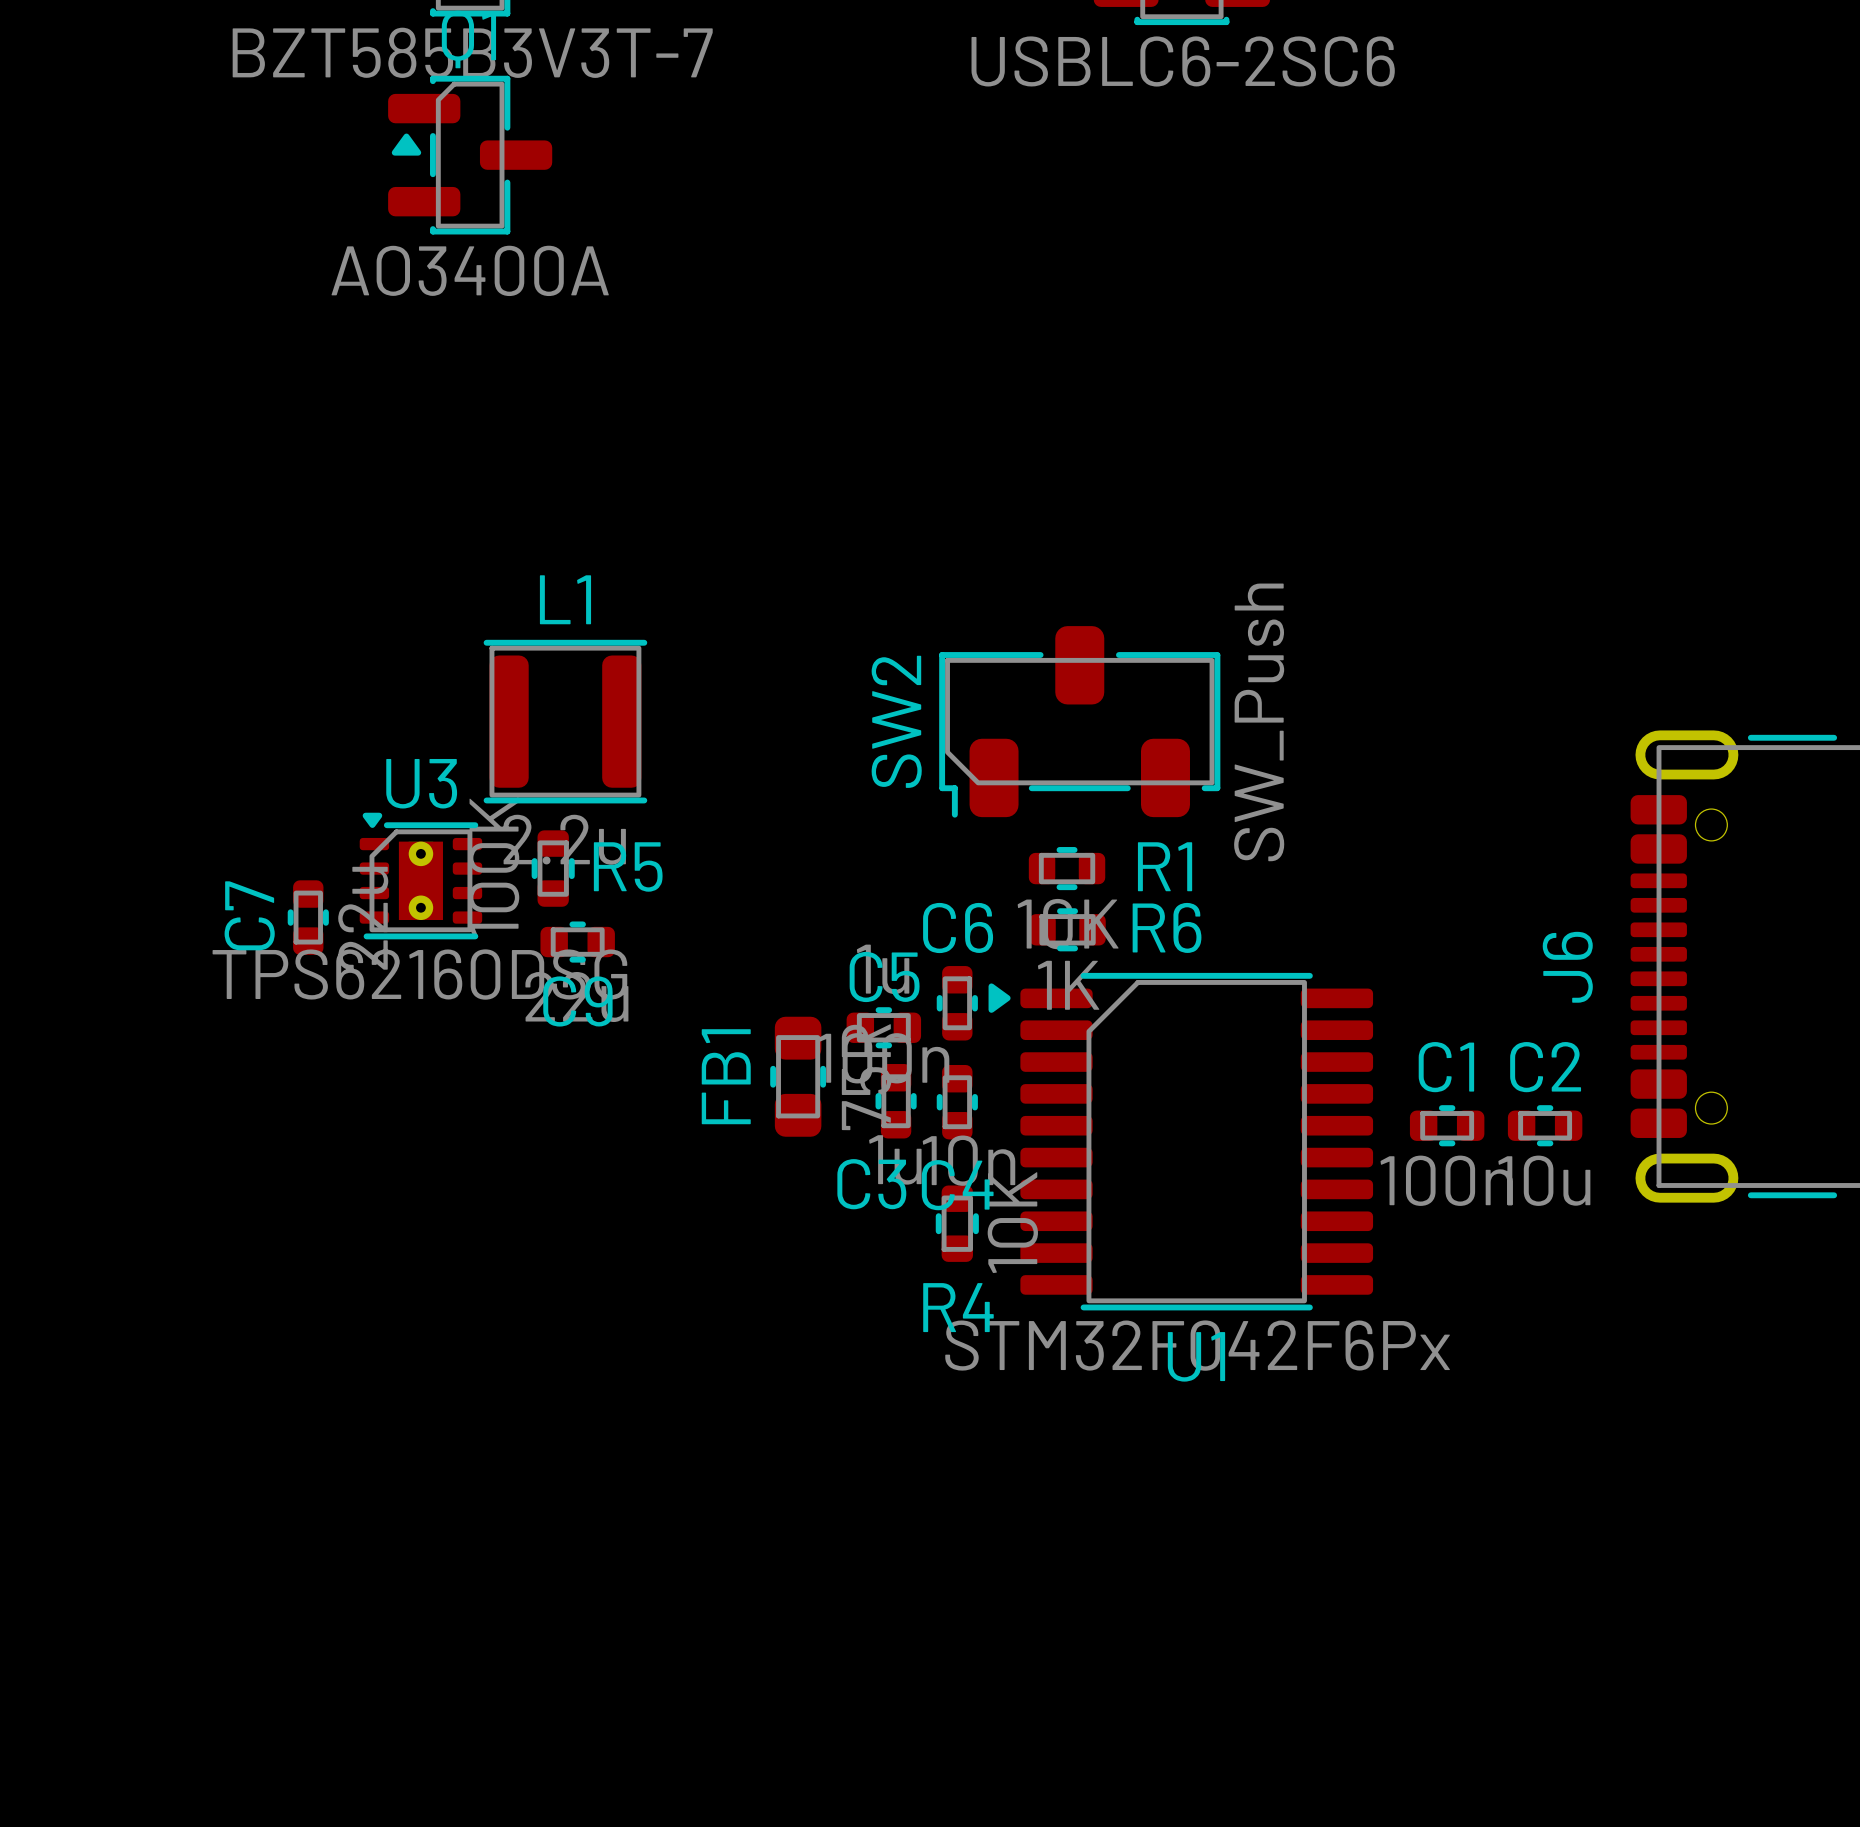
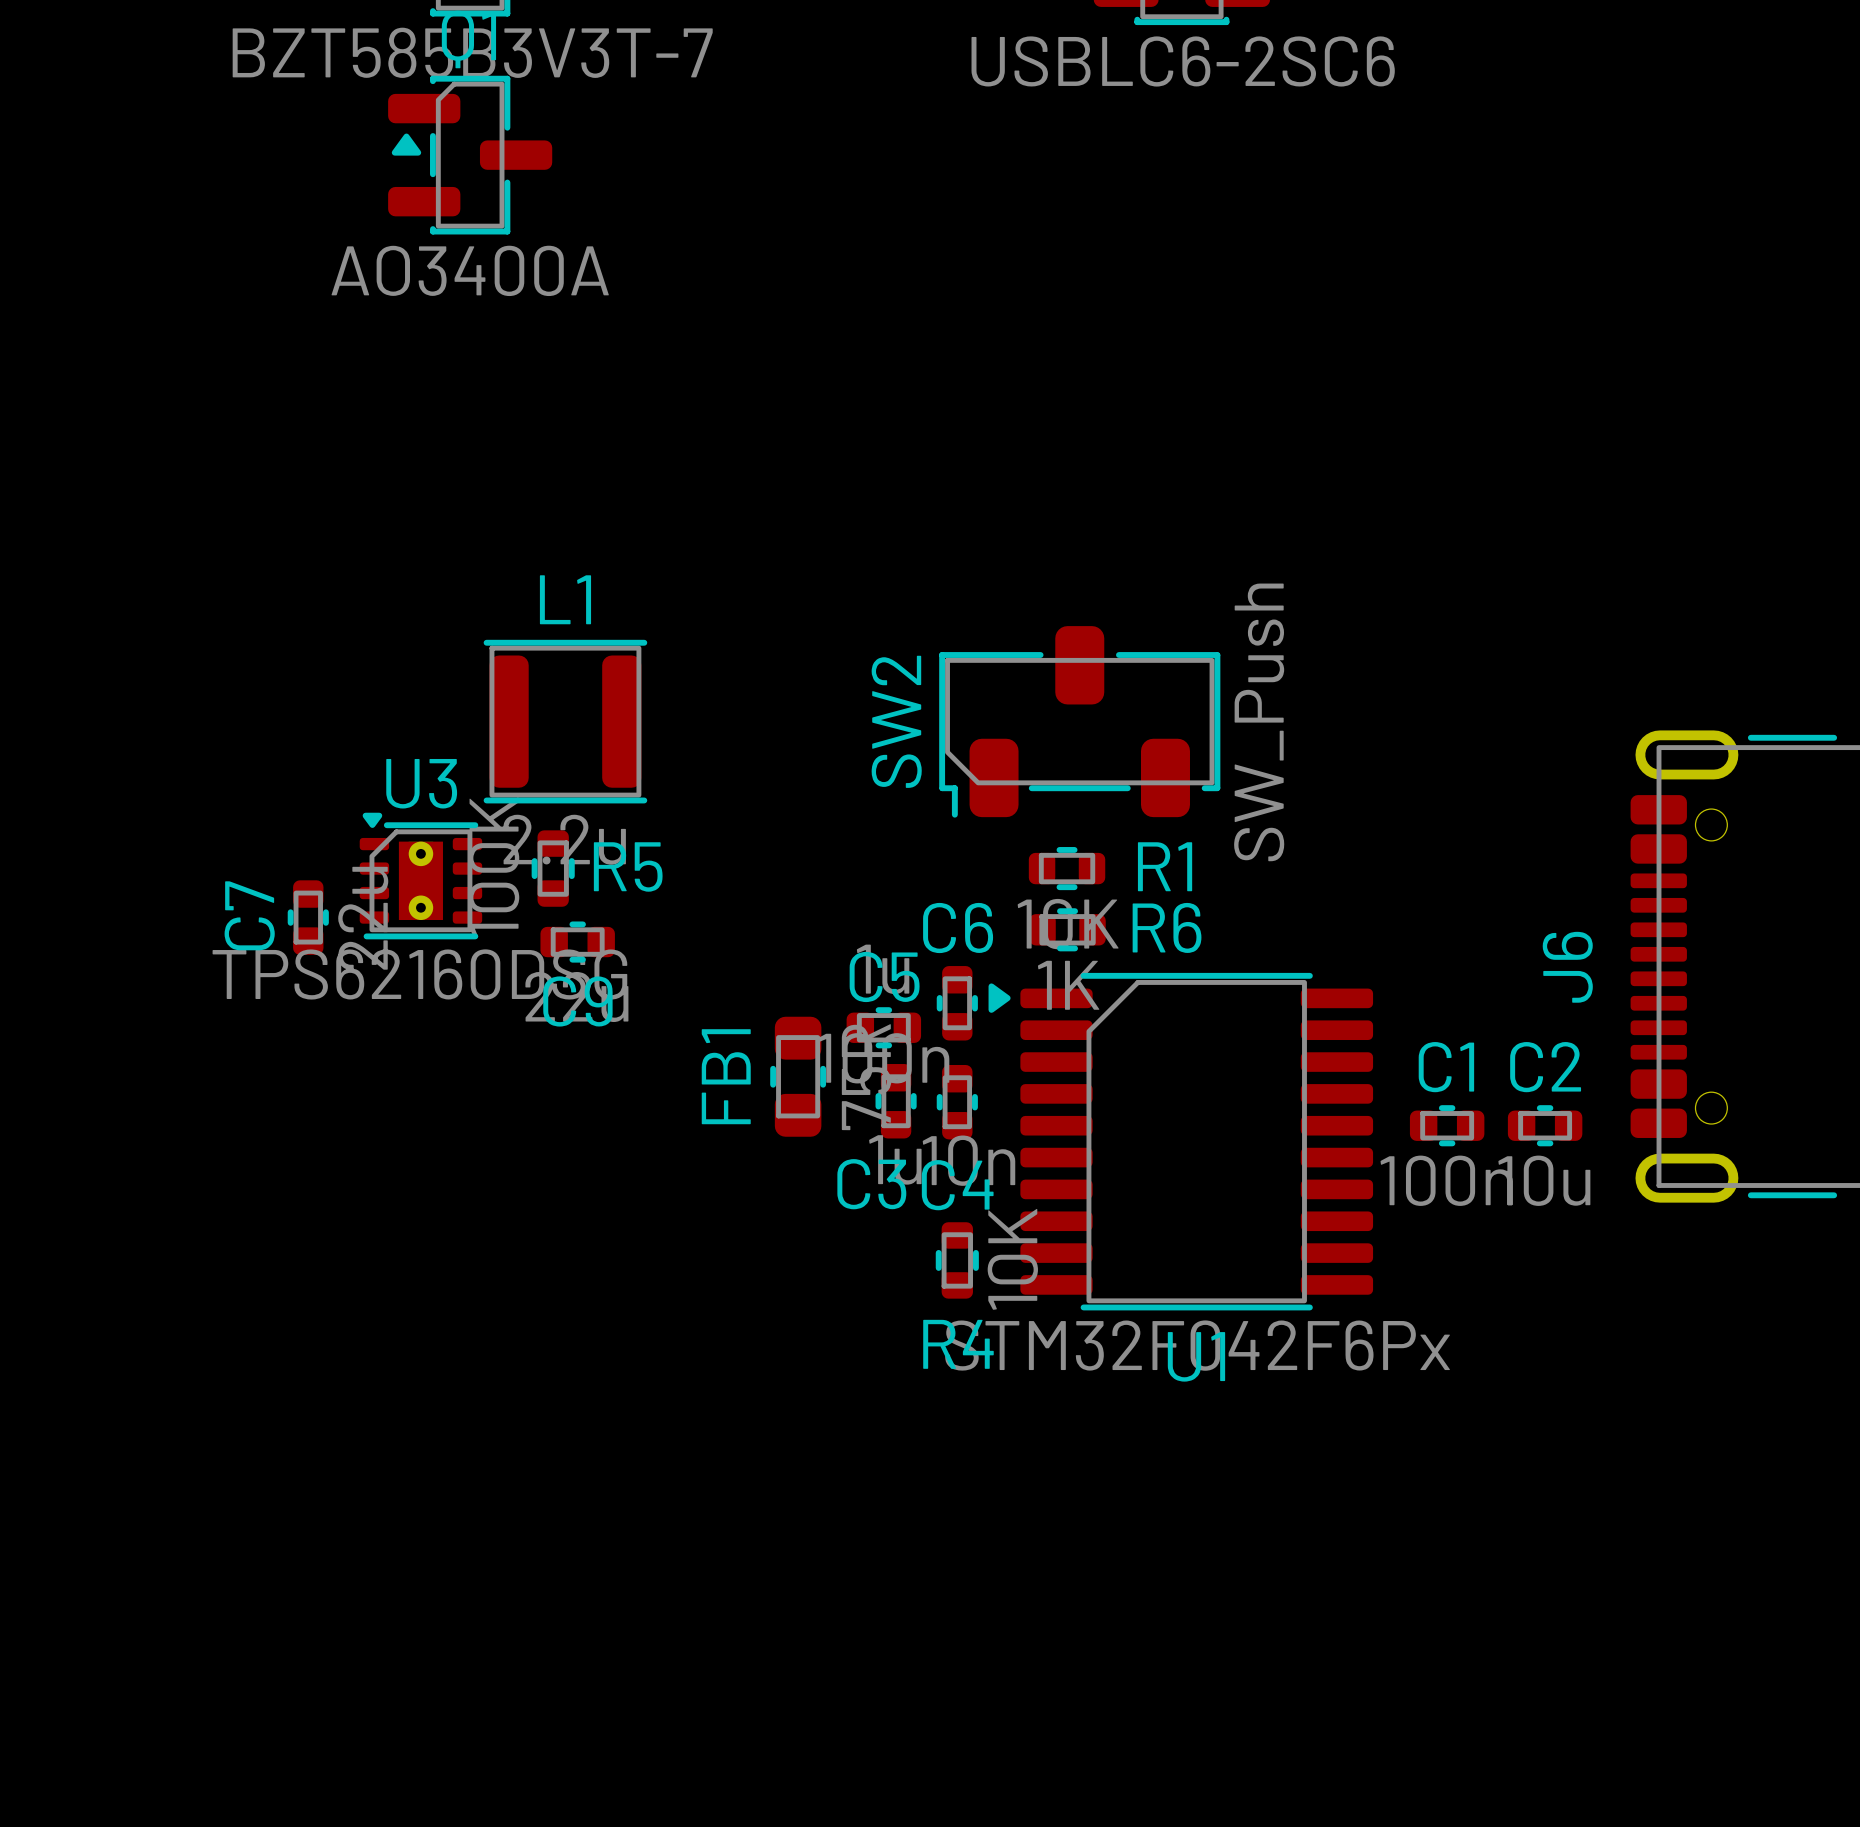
R4 position: (957, 1223) -> (957, 1260)

